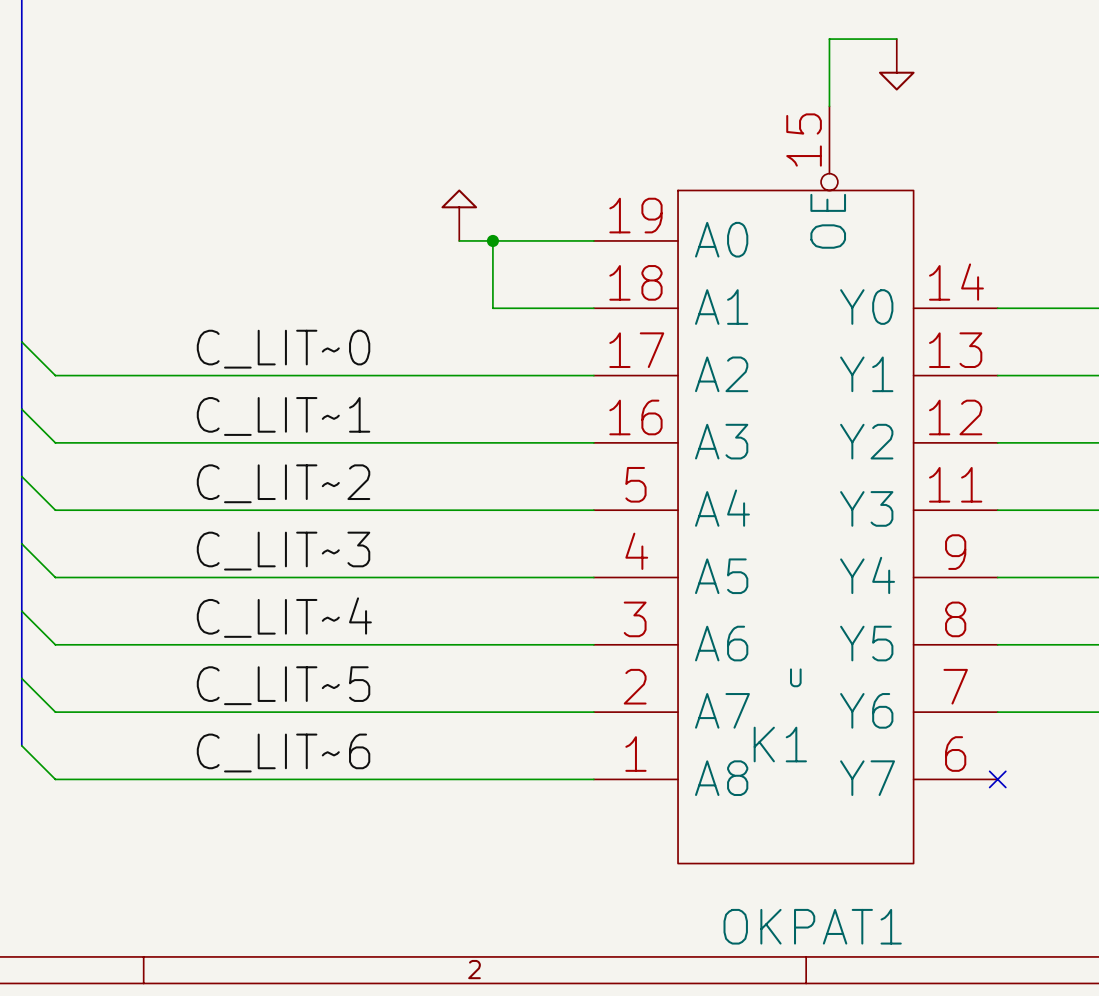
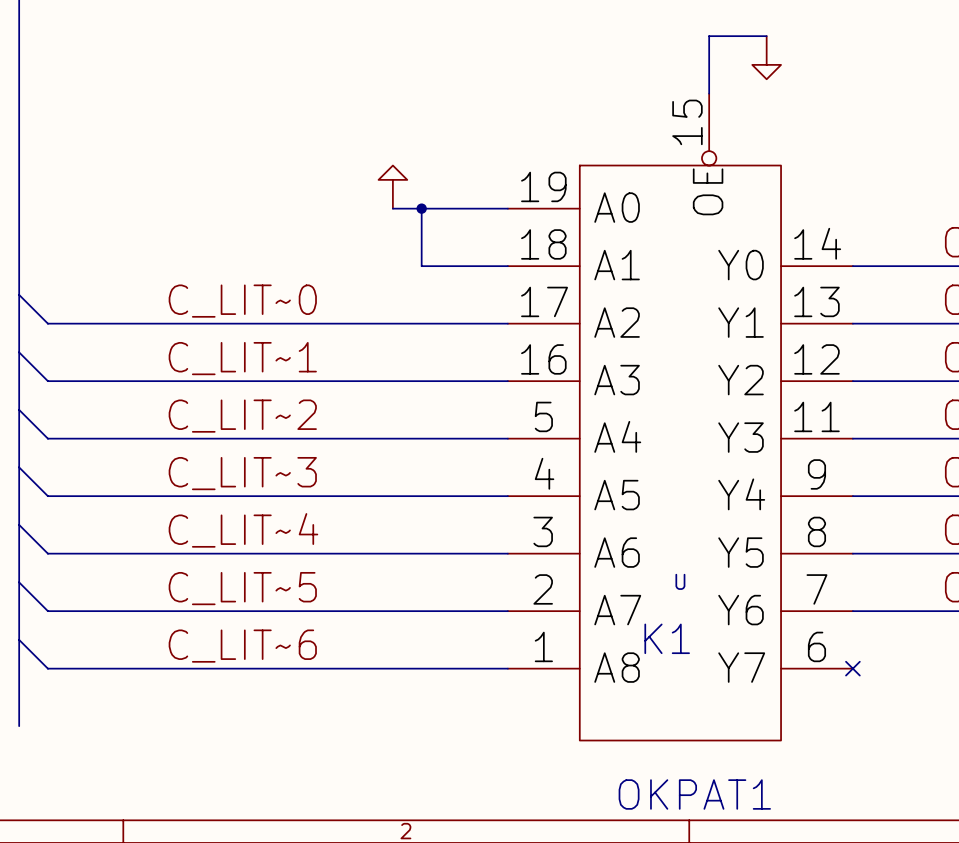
bus: none -> (19, 639) (19, 726)

